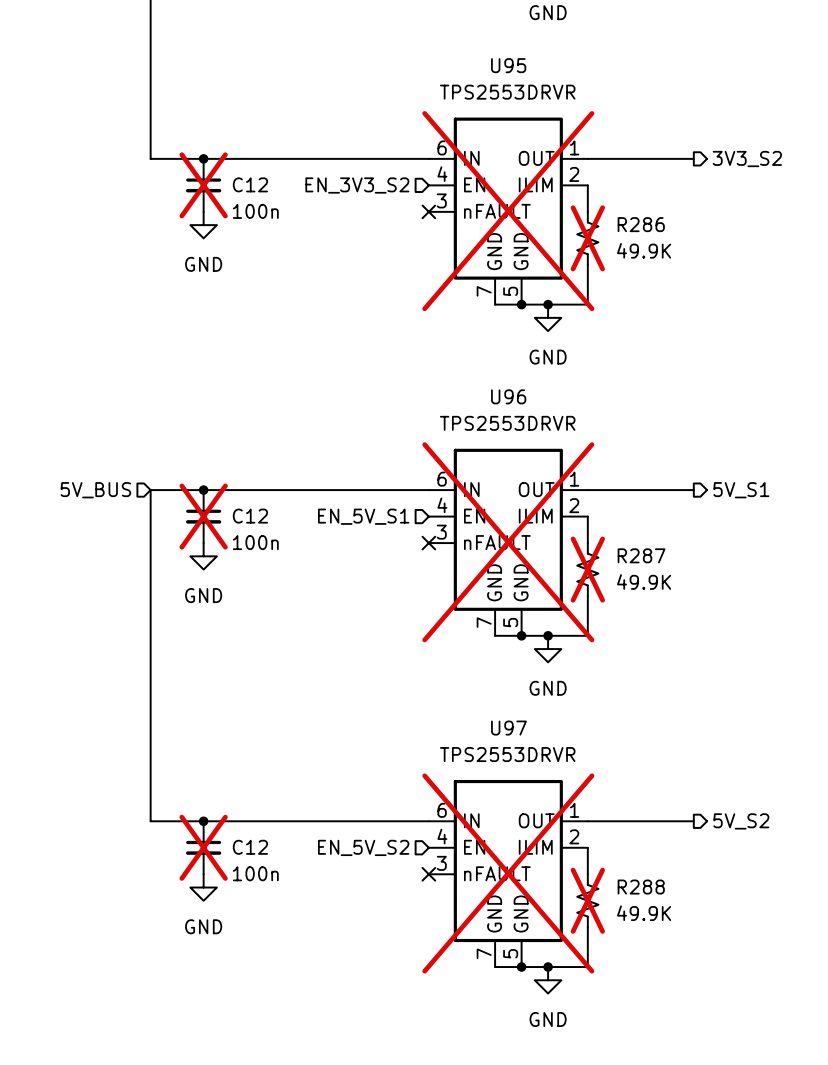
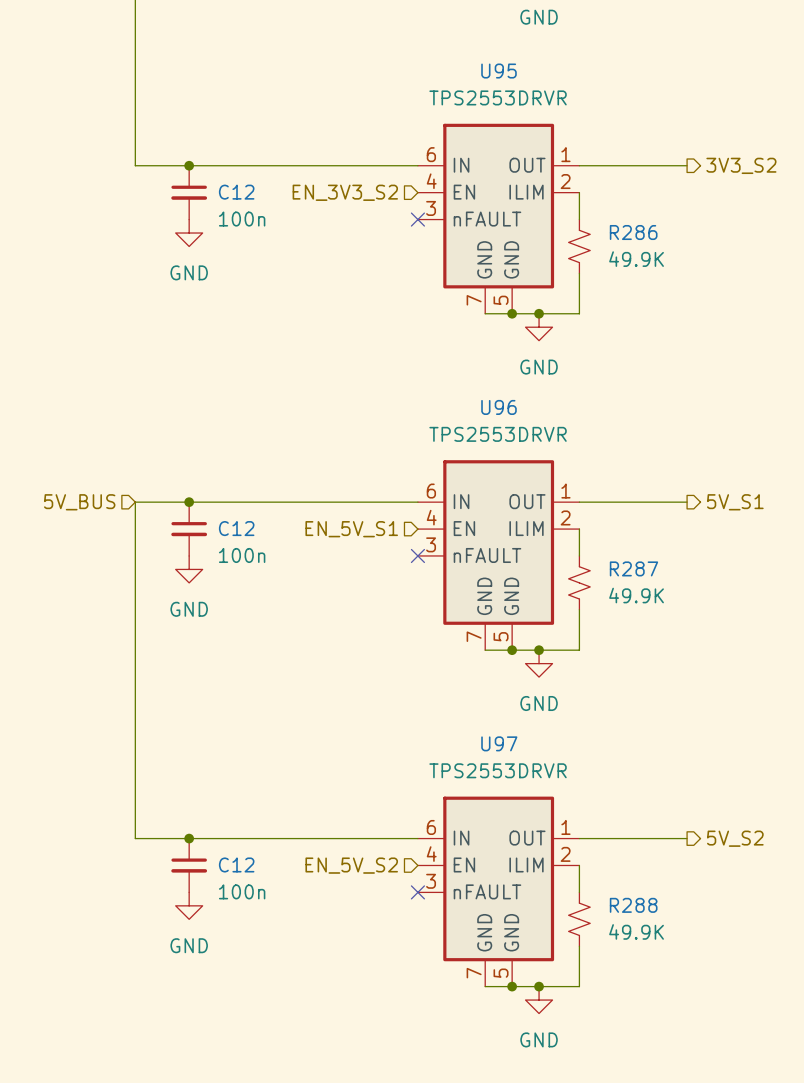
C12 do-not-place cross: (203, 185) -> none
U95 do-not-place cross: (508, 211) -> none
R286 do-not-place cross: (587, 238) -> none
C12 do-not-place cross: (203, 516) -> none
U96 do-not-place cross: (508, 542) -> none
R287 do-not-place cross: (587, 569) -> none
C12 do-not-place cross: (203, 847) -> none
U97 do-not-place cross: (508, 873) -> none
R288 do-not-place cross: (587, 900) -> none

